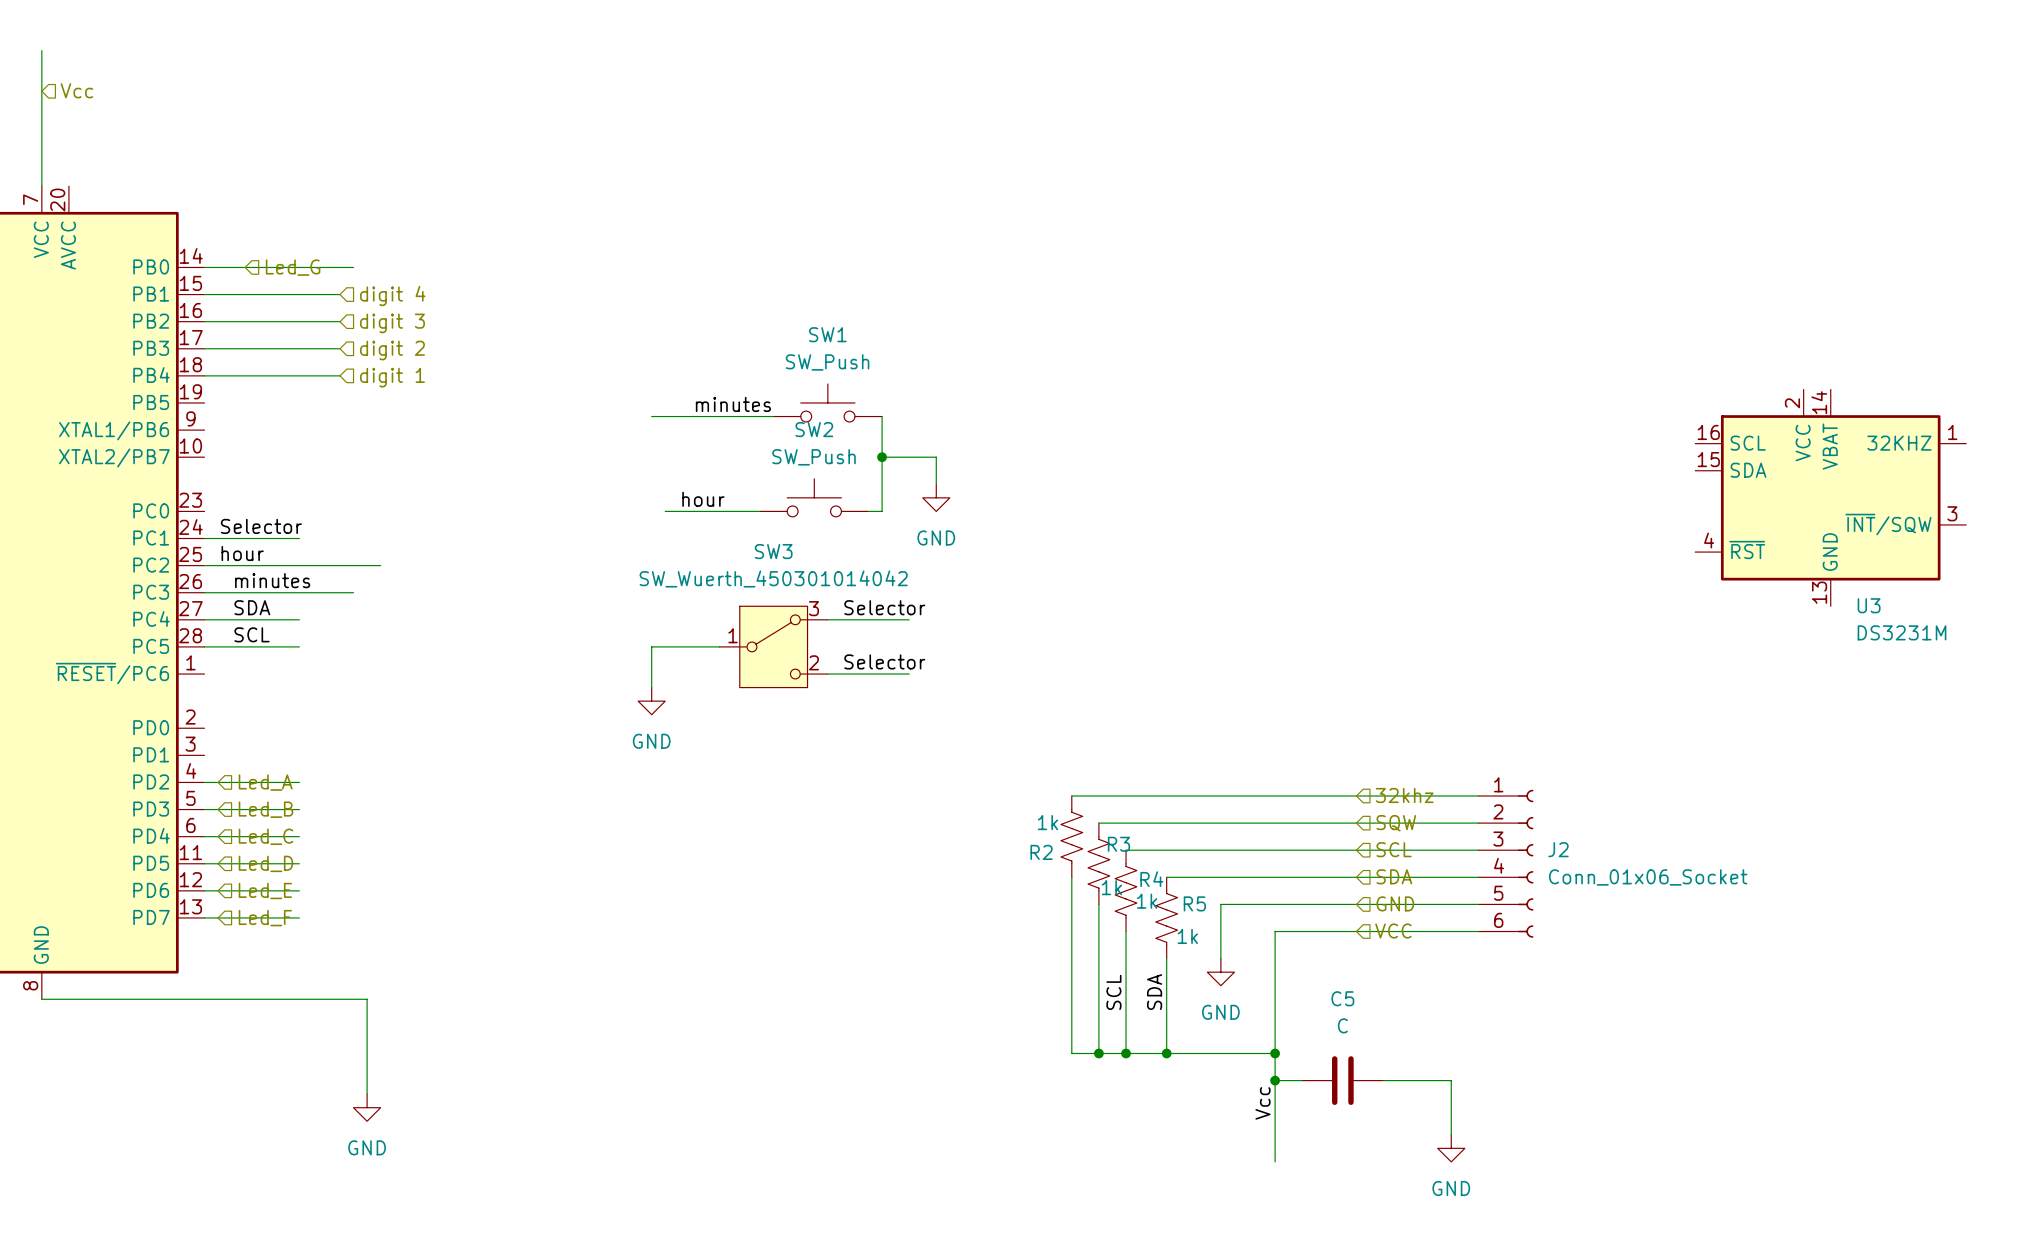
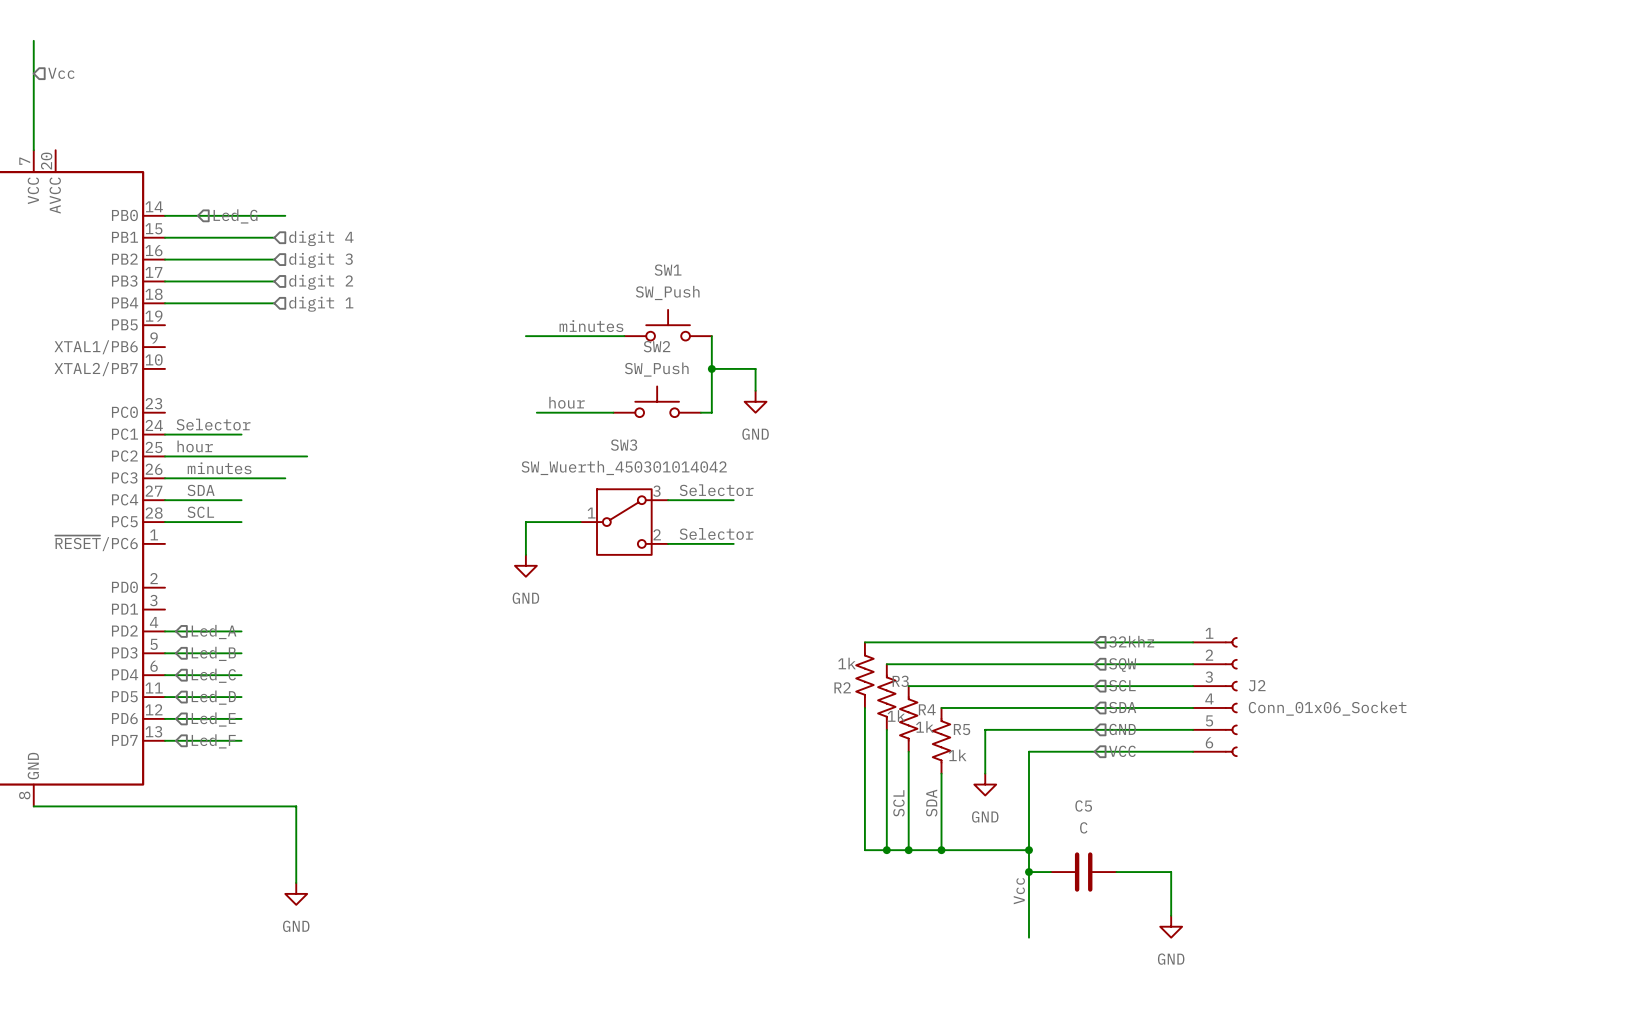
U3: DS3231M (1830, 497) -> none

